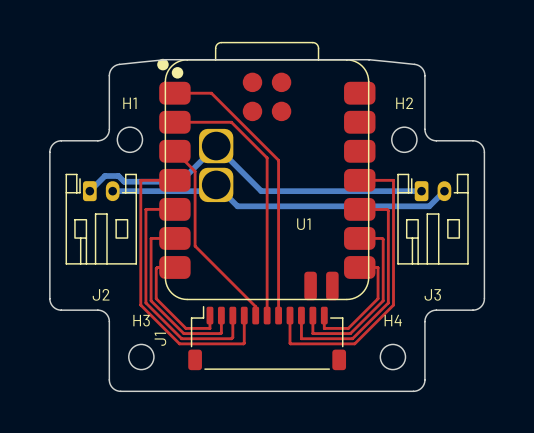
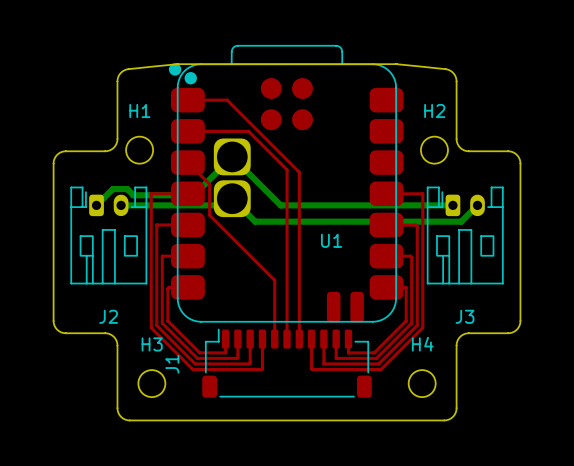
top track: (195, 200) (195, 246) (255, 306) -> (209, 215) (274, 280) (274, 329)

